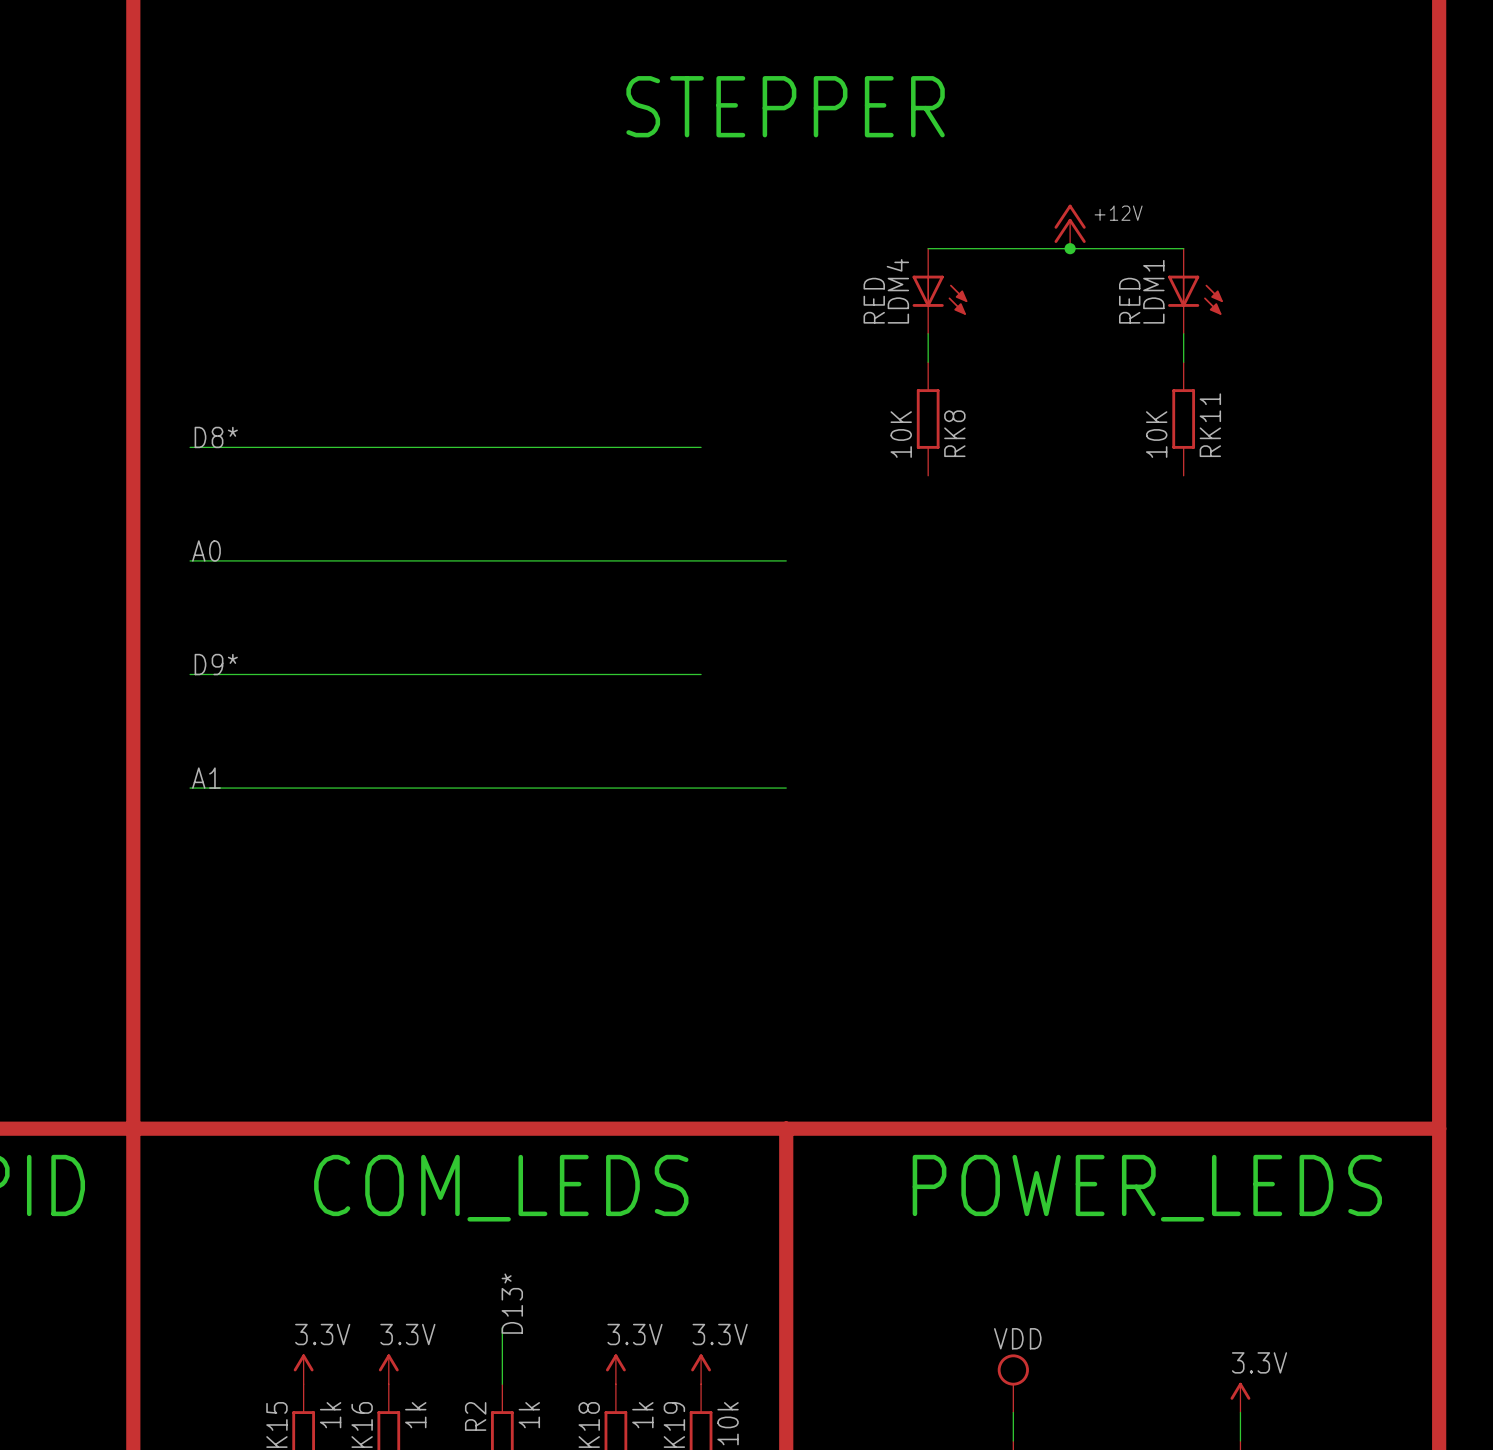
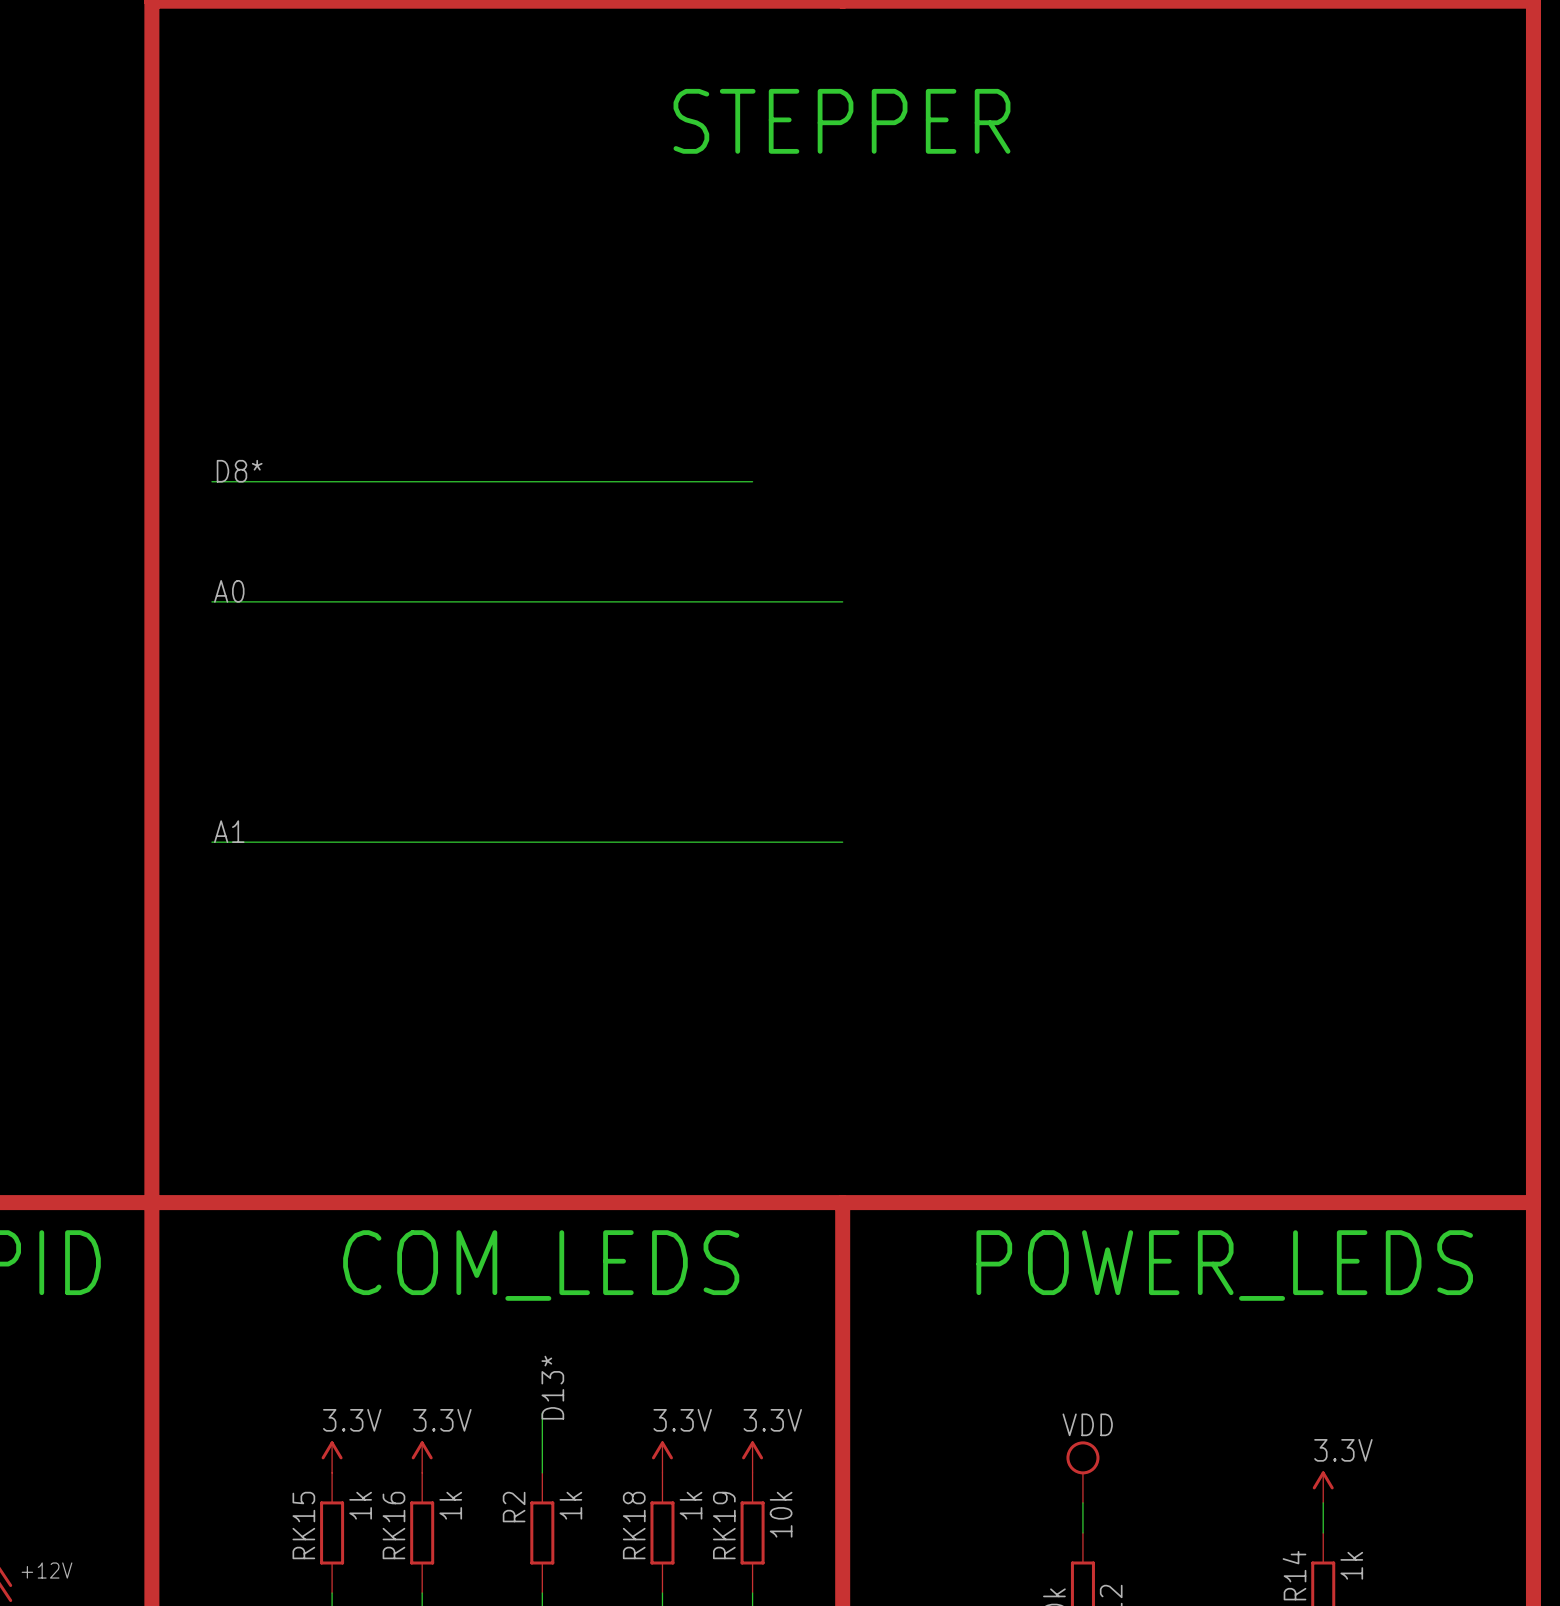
power symbol: +12V (1070, 226) -> none
wire: (928, 248) (1183, 248) -> none
junction: (1070, 248) -> none
LDM4: RED (939, 291) -> none
LDM1: RED (1195, 291) -> none
wire: (928, 333) (928, 362) -> none
wire: (1183, 333) (1183, 362) -> none
RK8: 10K (928, 418) -> none
RK11: 10K (1183, 418) -> none
label: D9* (216, 664) -> none
wire: (190, 674) (701, 674) -> none

